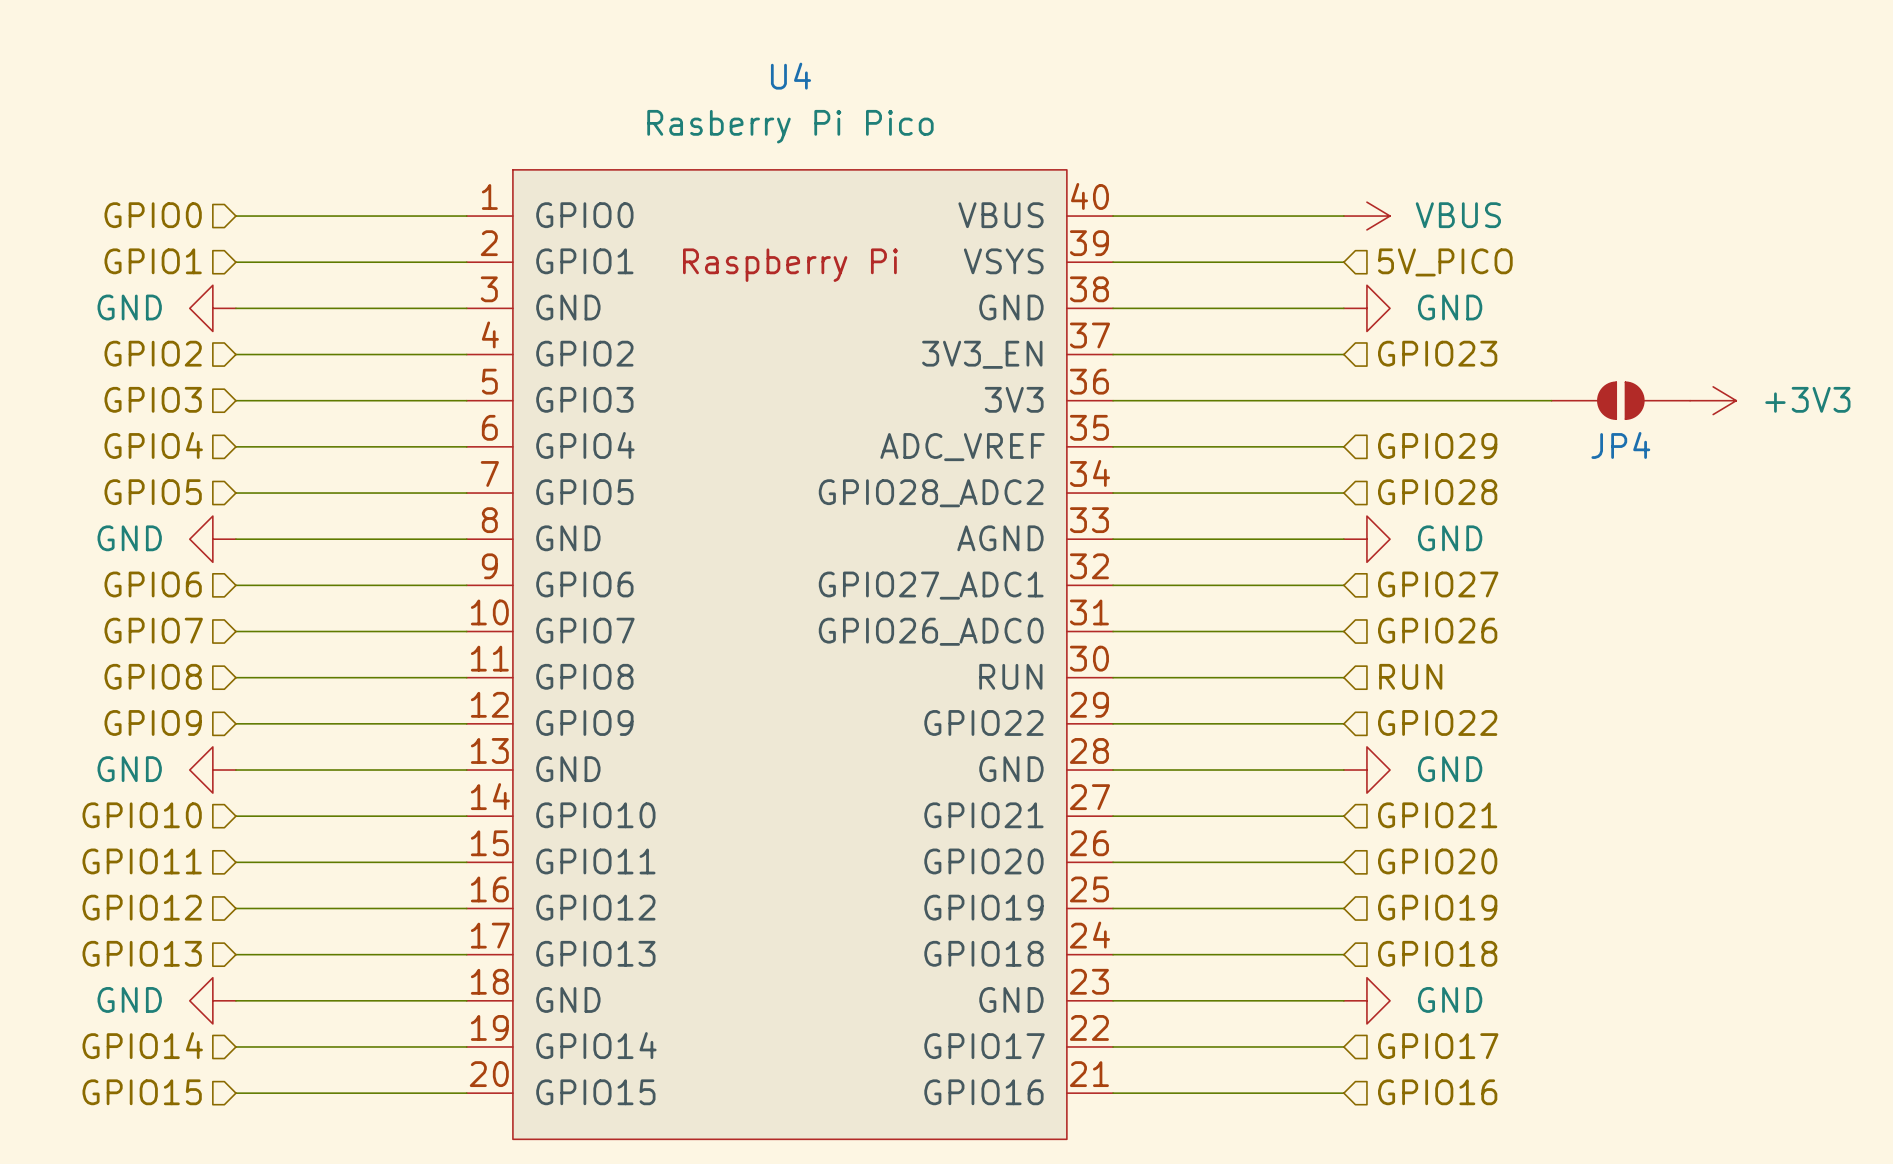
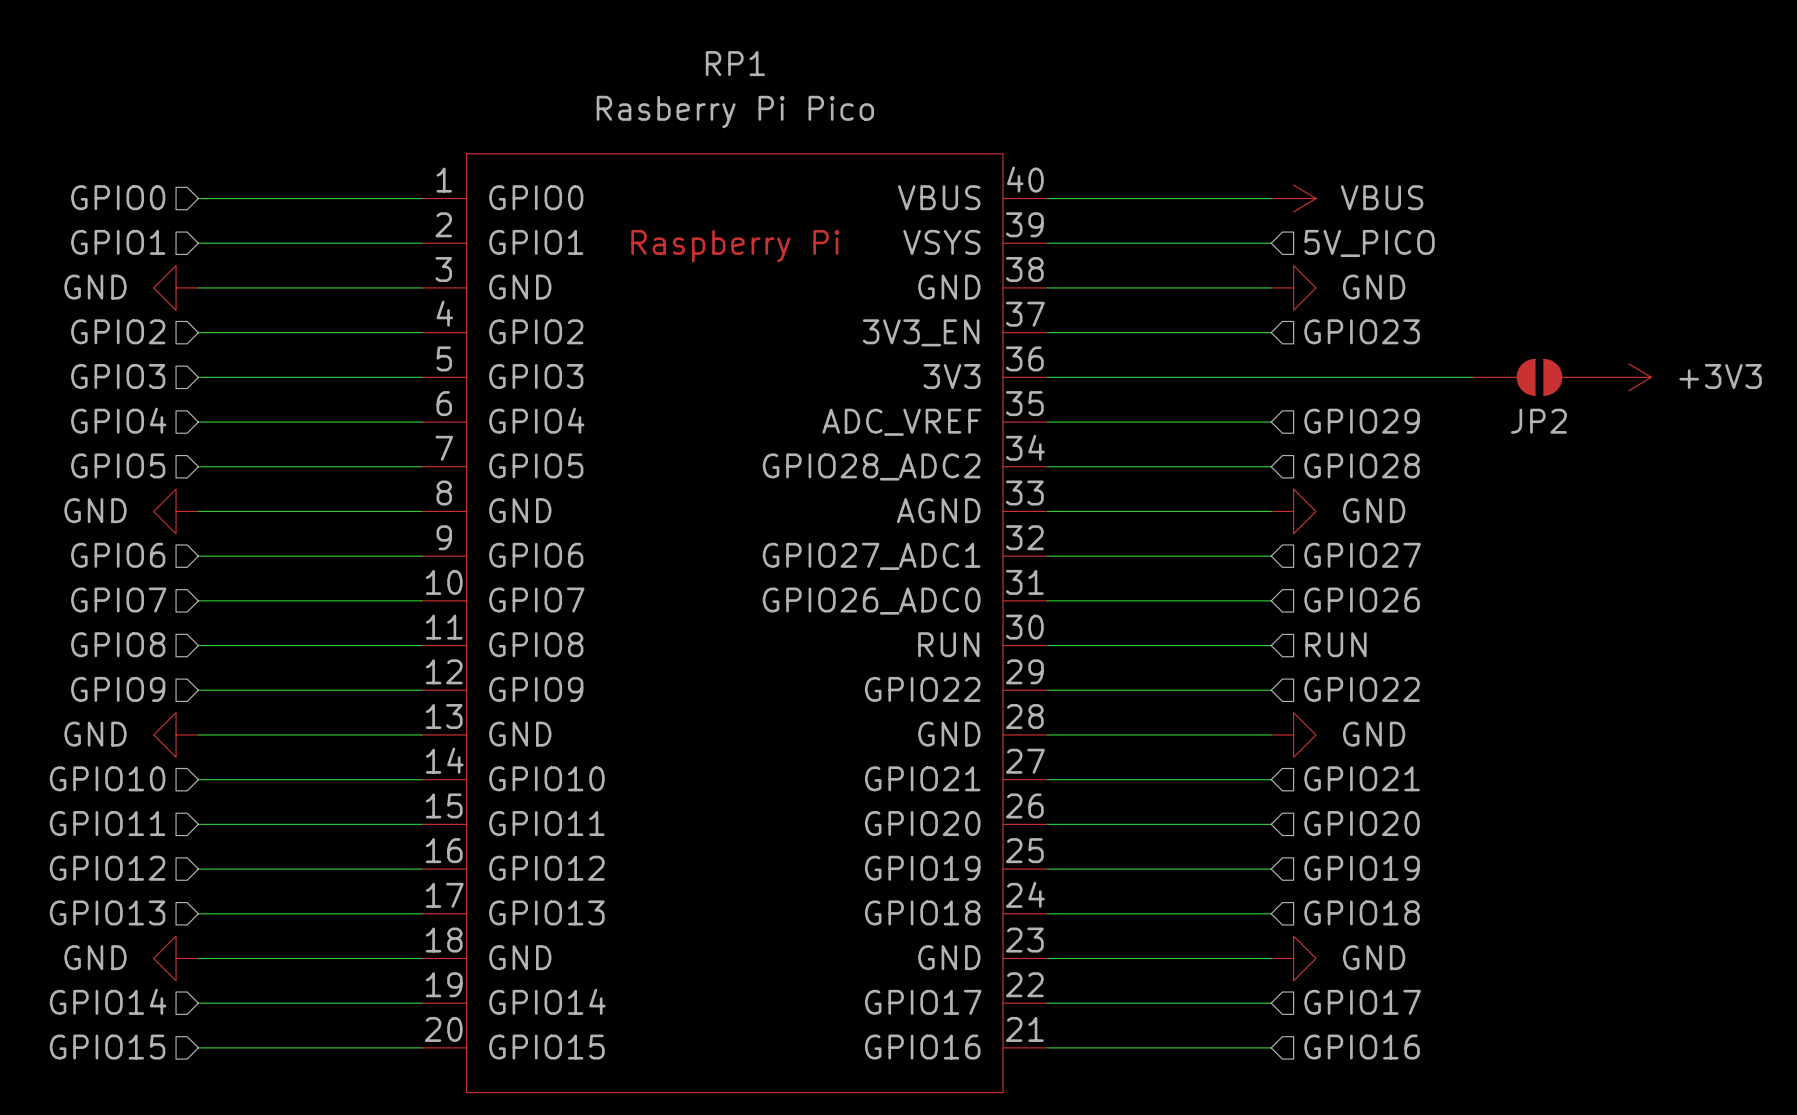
U4 name: U4 (791, 76) -> RP1 (735, 63)
JP4 name: JP4 (1620, 445) -> JP2 (1538, 421)

